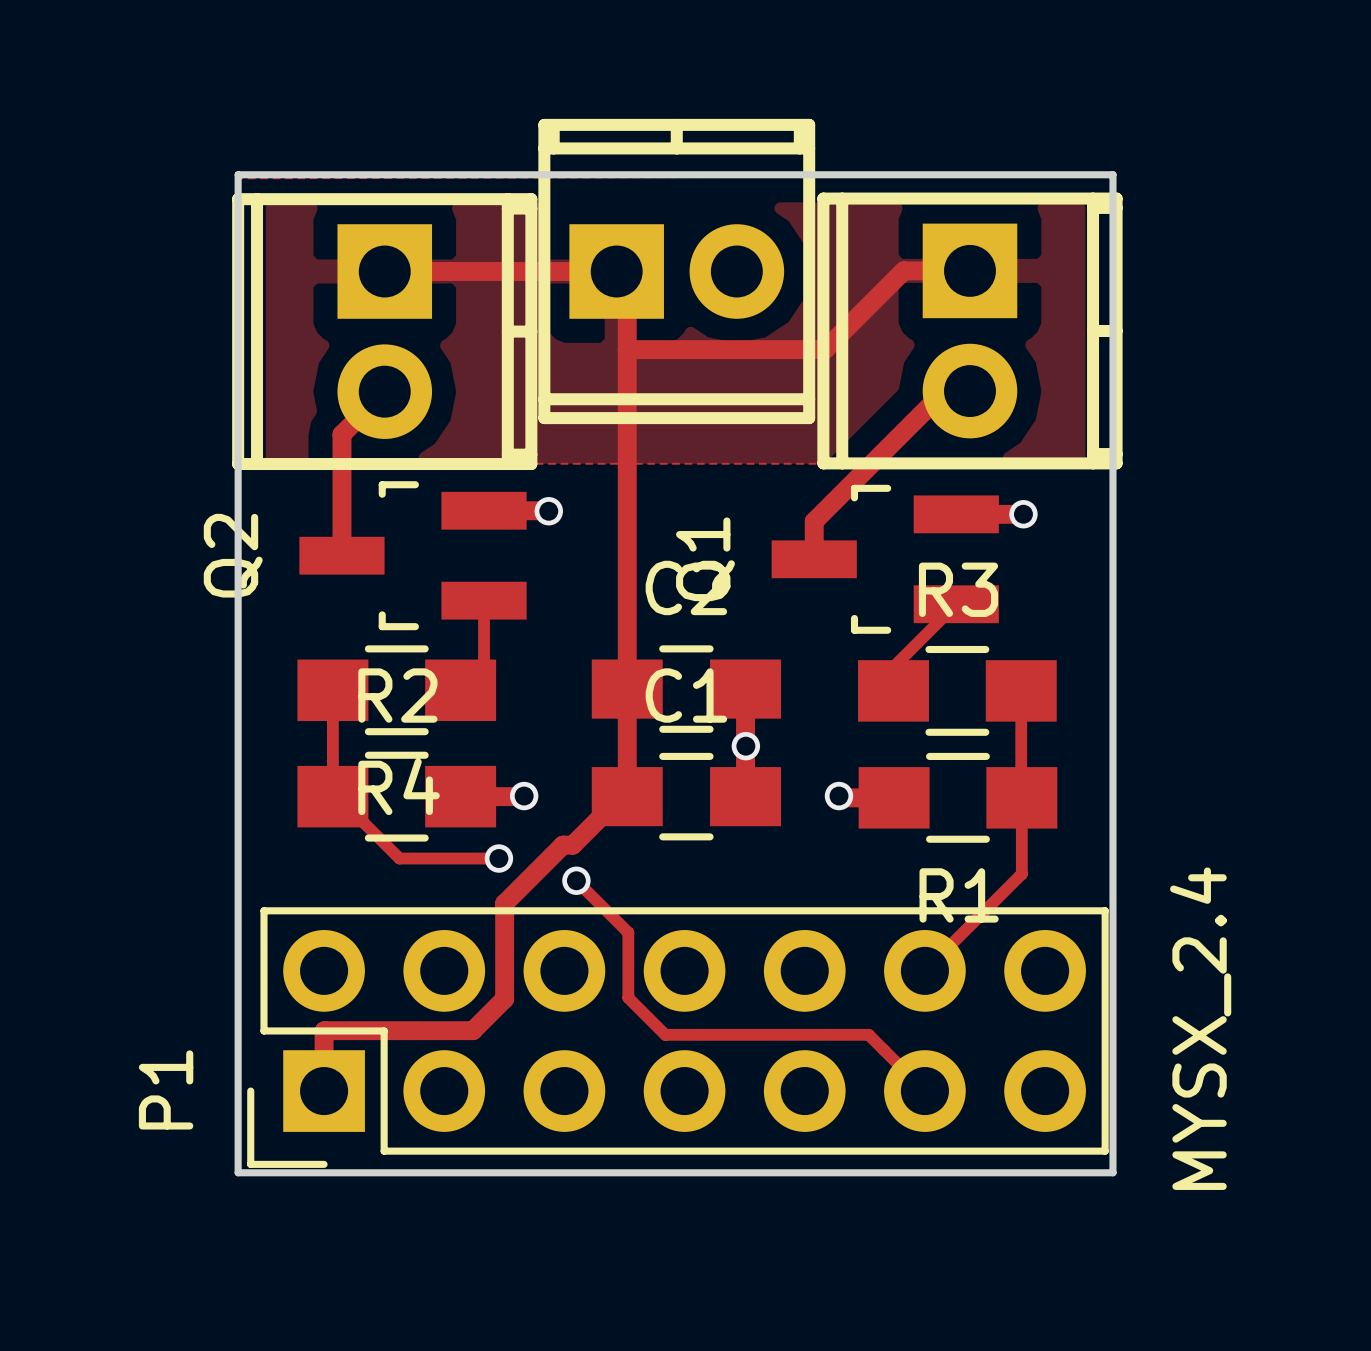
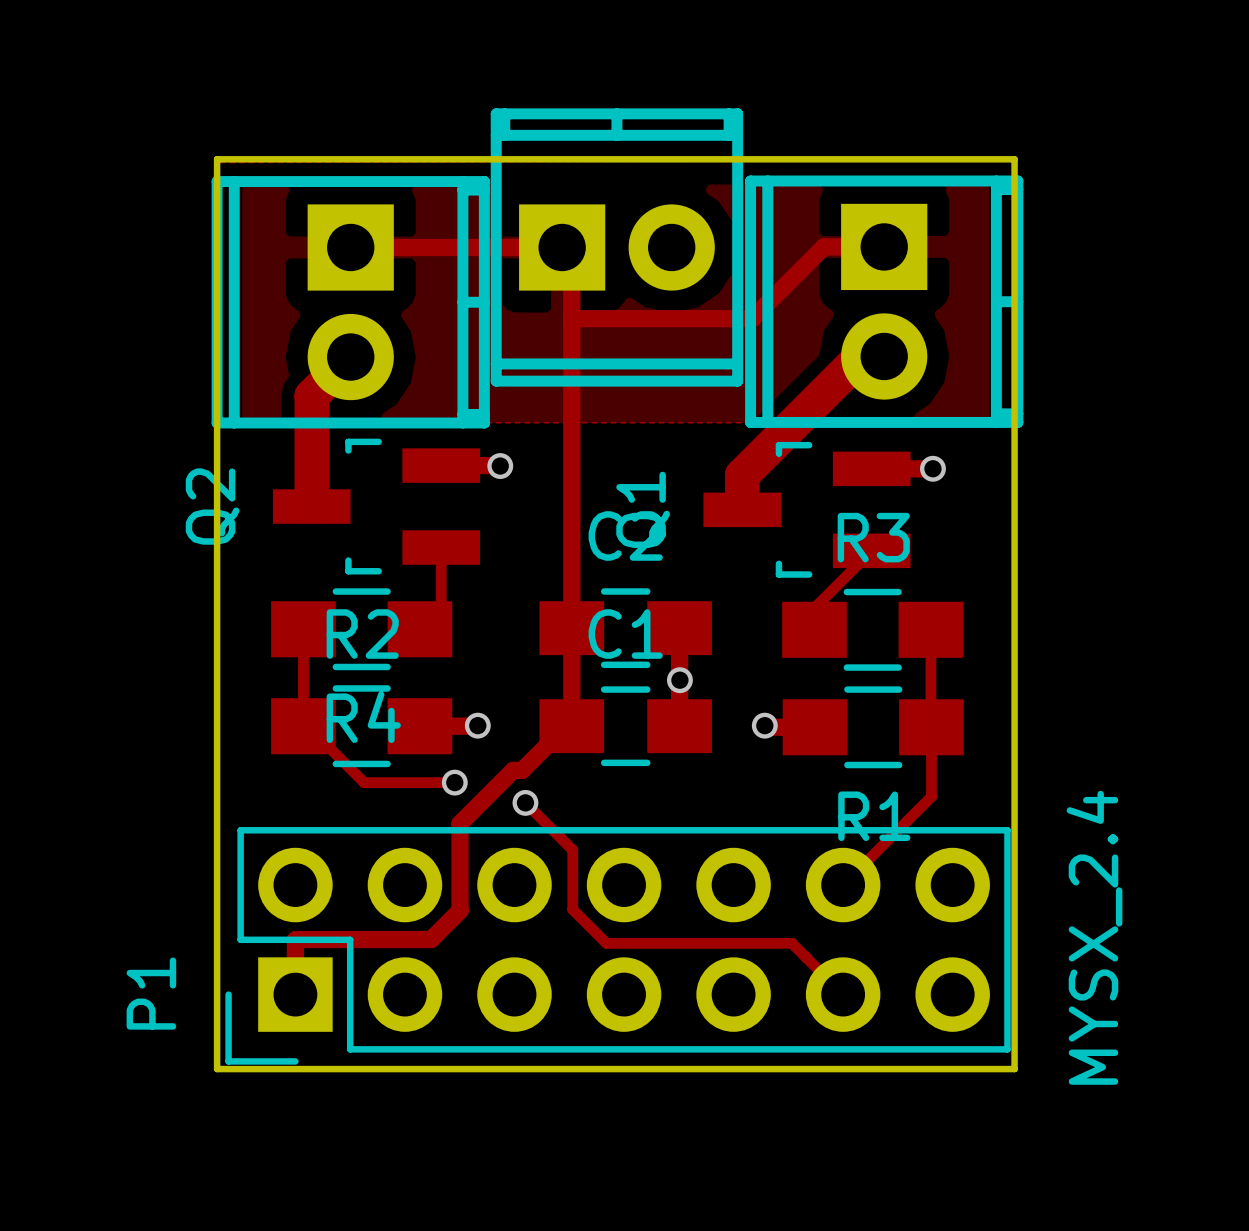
track width: thin (384, 391) (341, 434) (341, 555) -> thick (350, 357) (311, 396) (311, 506)
track width: thin (969, 391) (944, 391) (814, 521) (814, 559) -> thick (884, 356) (861, 356) (742, 475) (742, 509)

